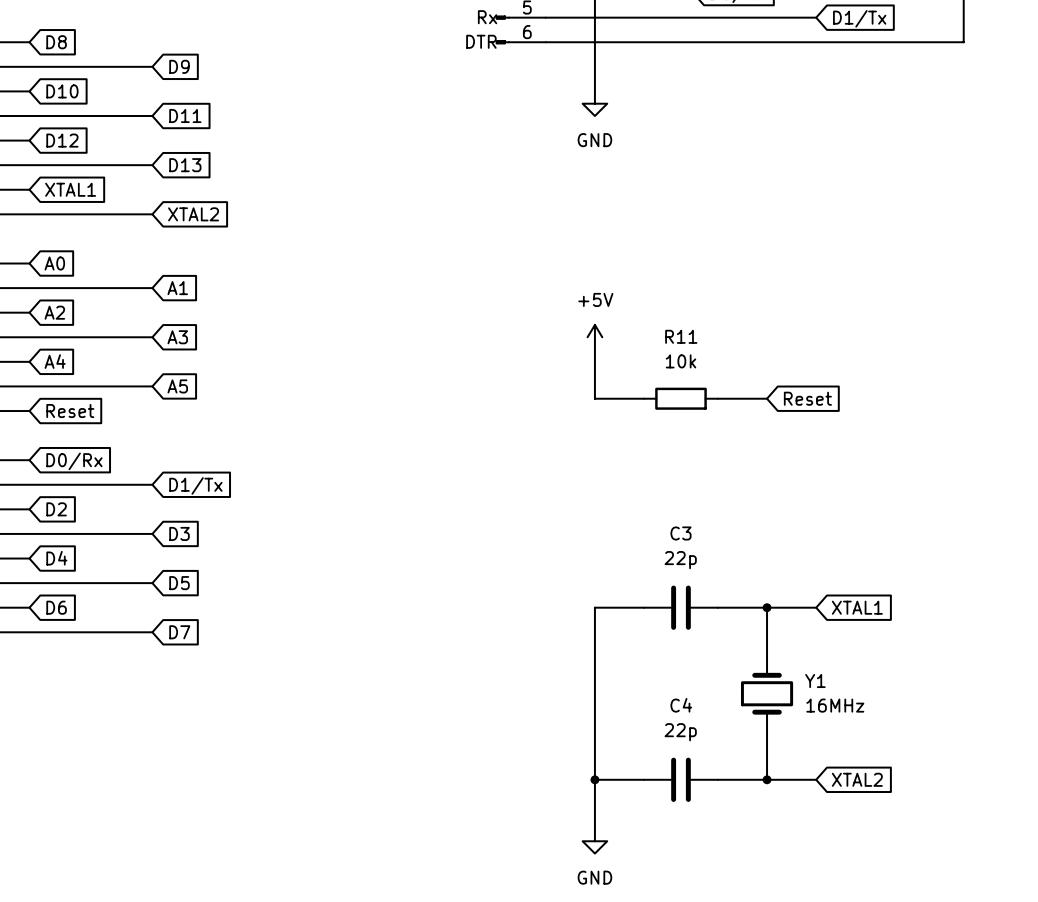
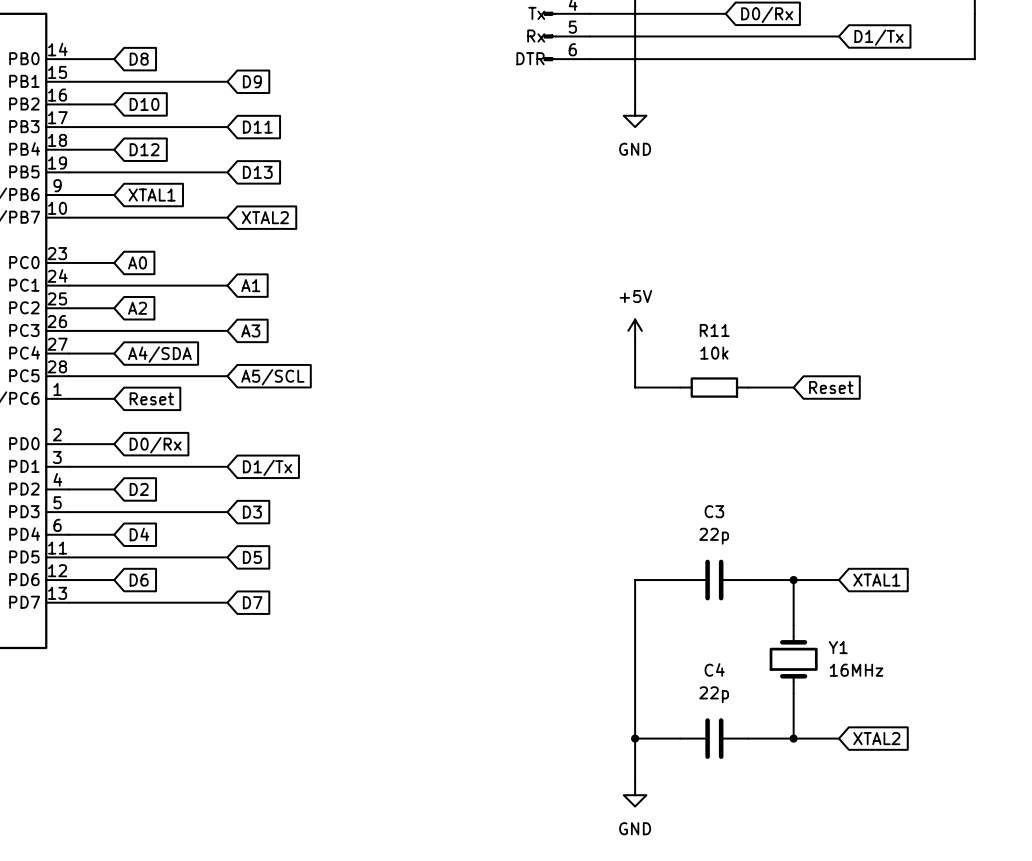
global label: A4 (55, 361) -> A4/SDA (159, 354)
global label: A5 (177, 386) -> A5/SCL (272, 377)

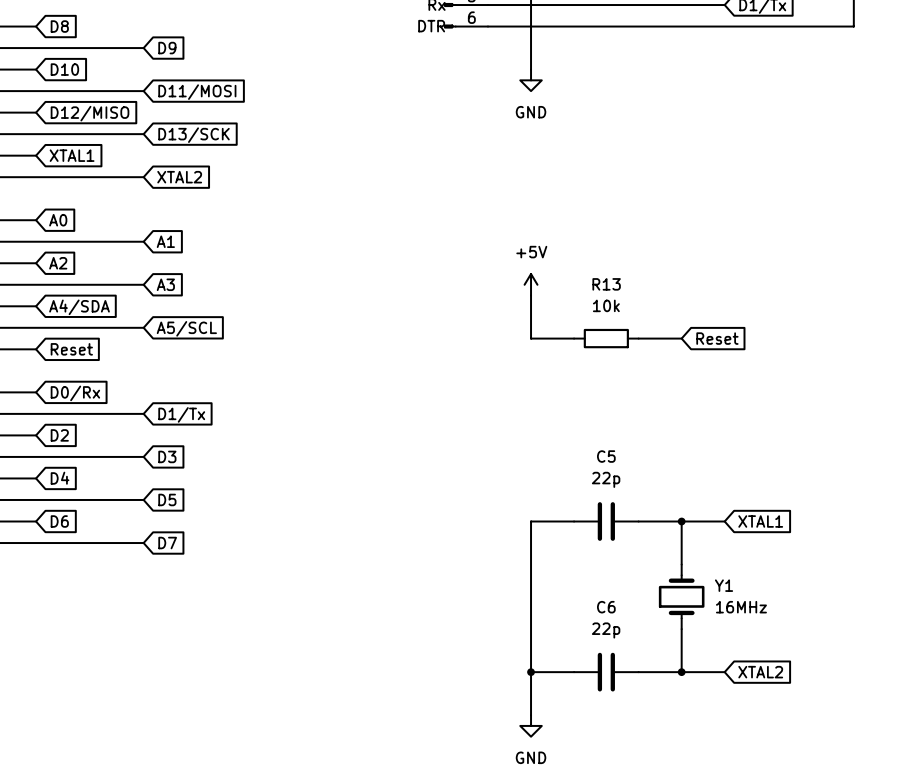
global label: D11 (257, 127) -> D11/MOSI (197, 92)
global label: D12 (144, 149) -> D12/MISO (90, 113)
global label: D13 (257, 172) -> D13/SCK (194, 135)
R11 name: R11 (714, 330) -> R13 (606, 284)
C3 name: C3 (714, 511) -> C5 (606, 456)
C4 name: C4 (714, 669) -> C6 (606, 607)

